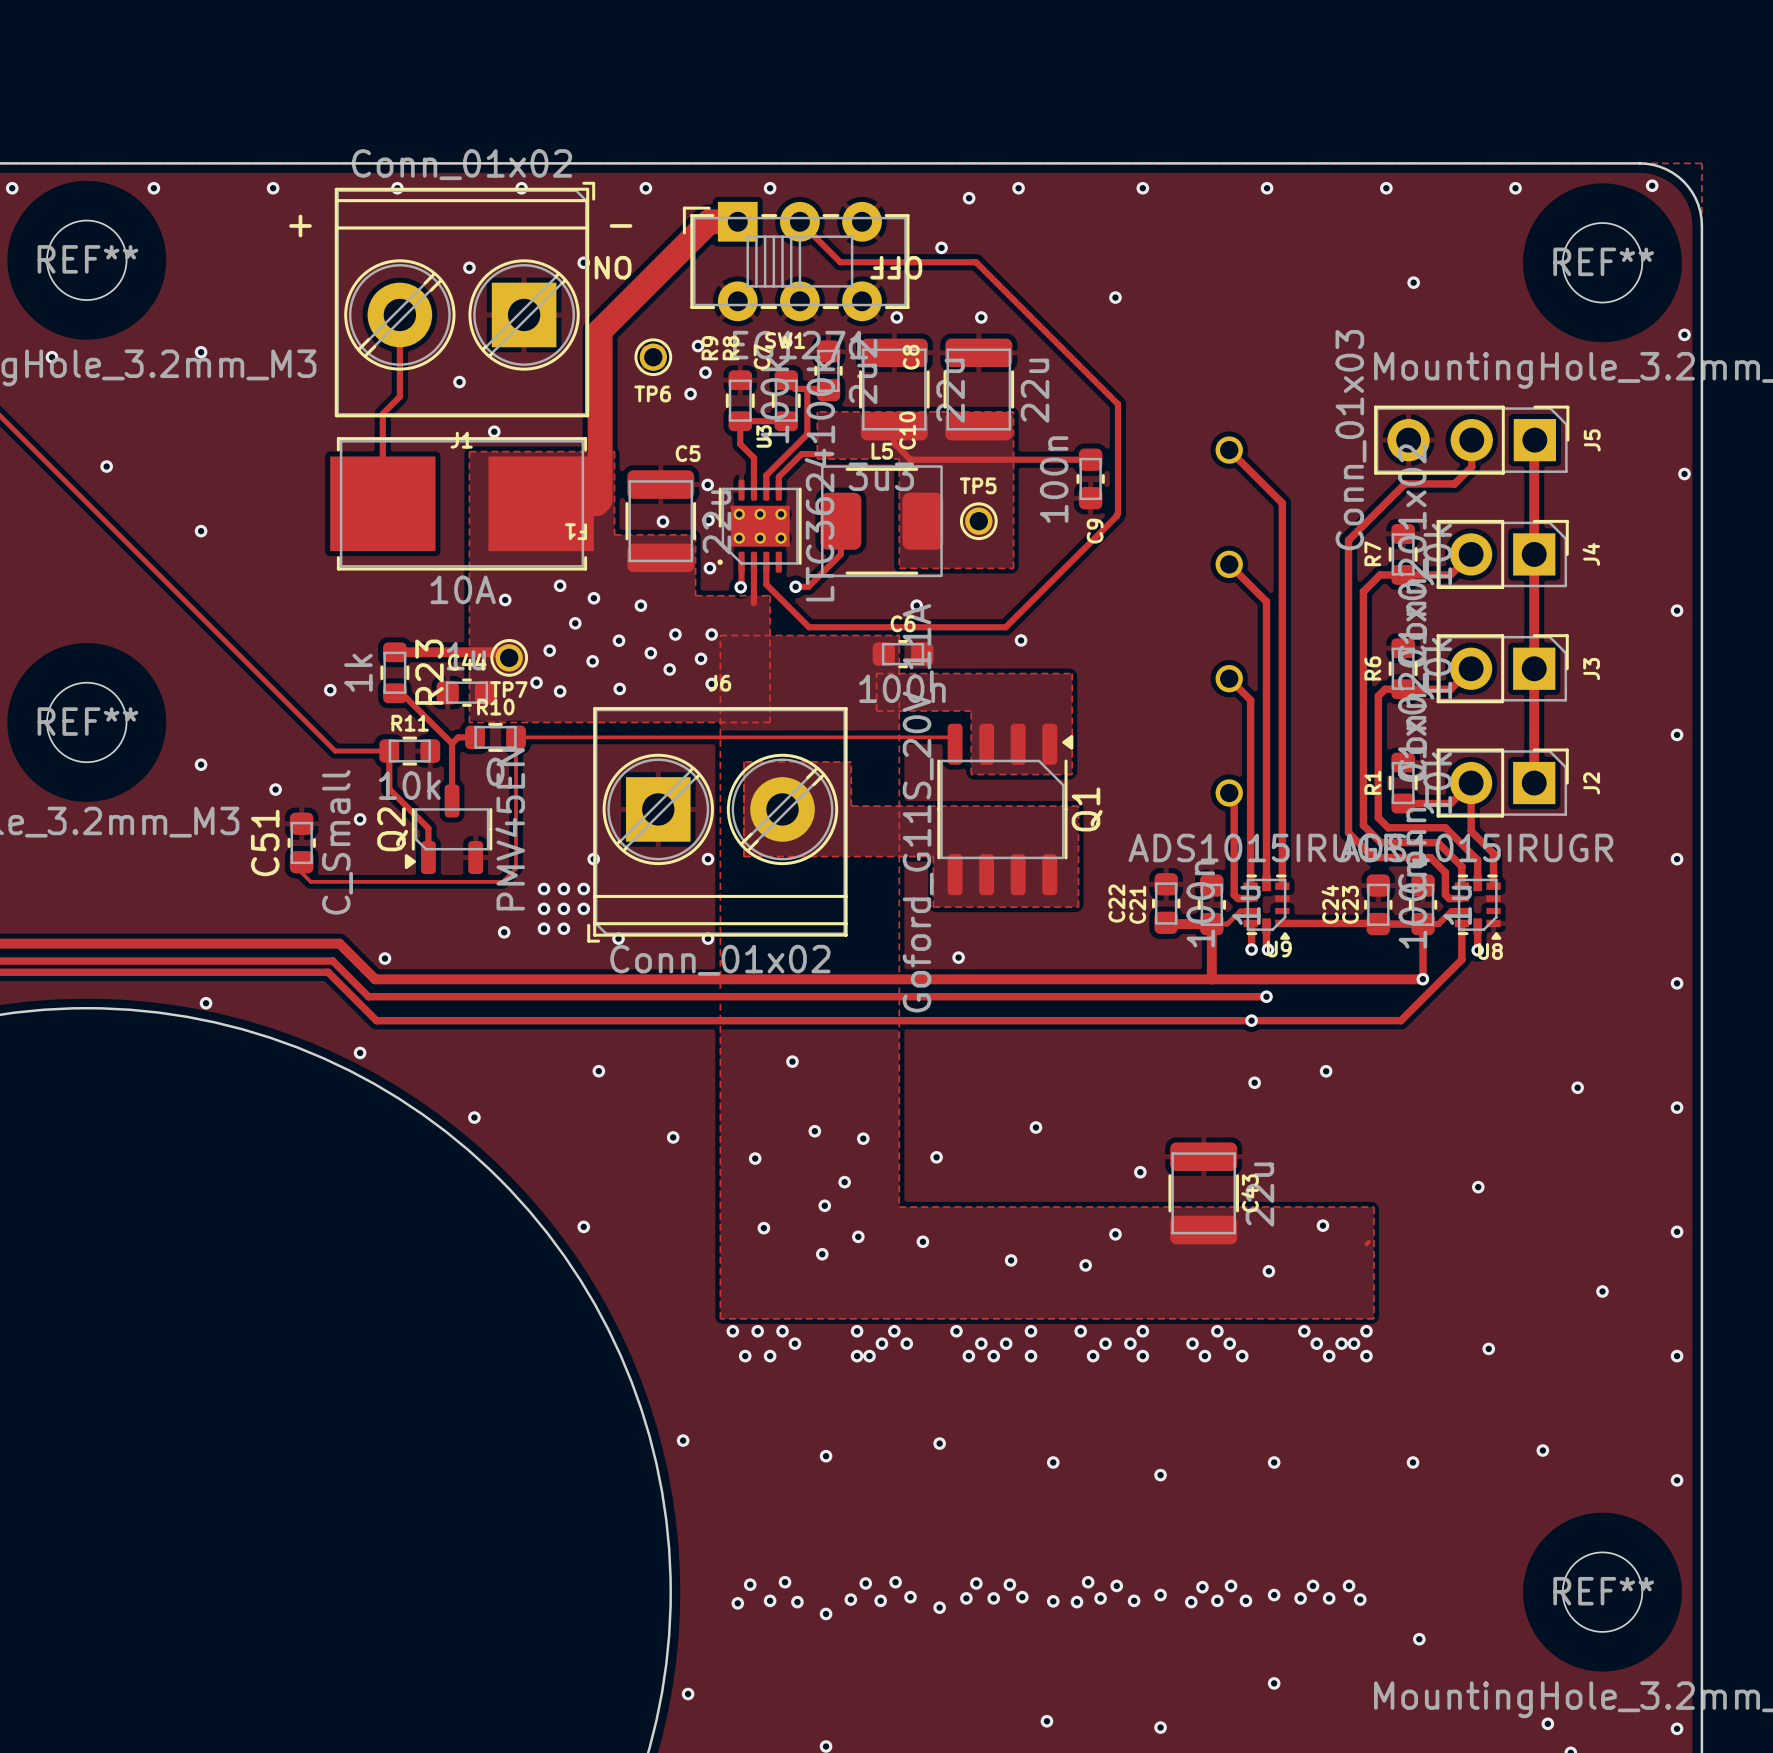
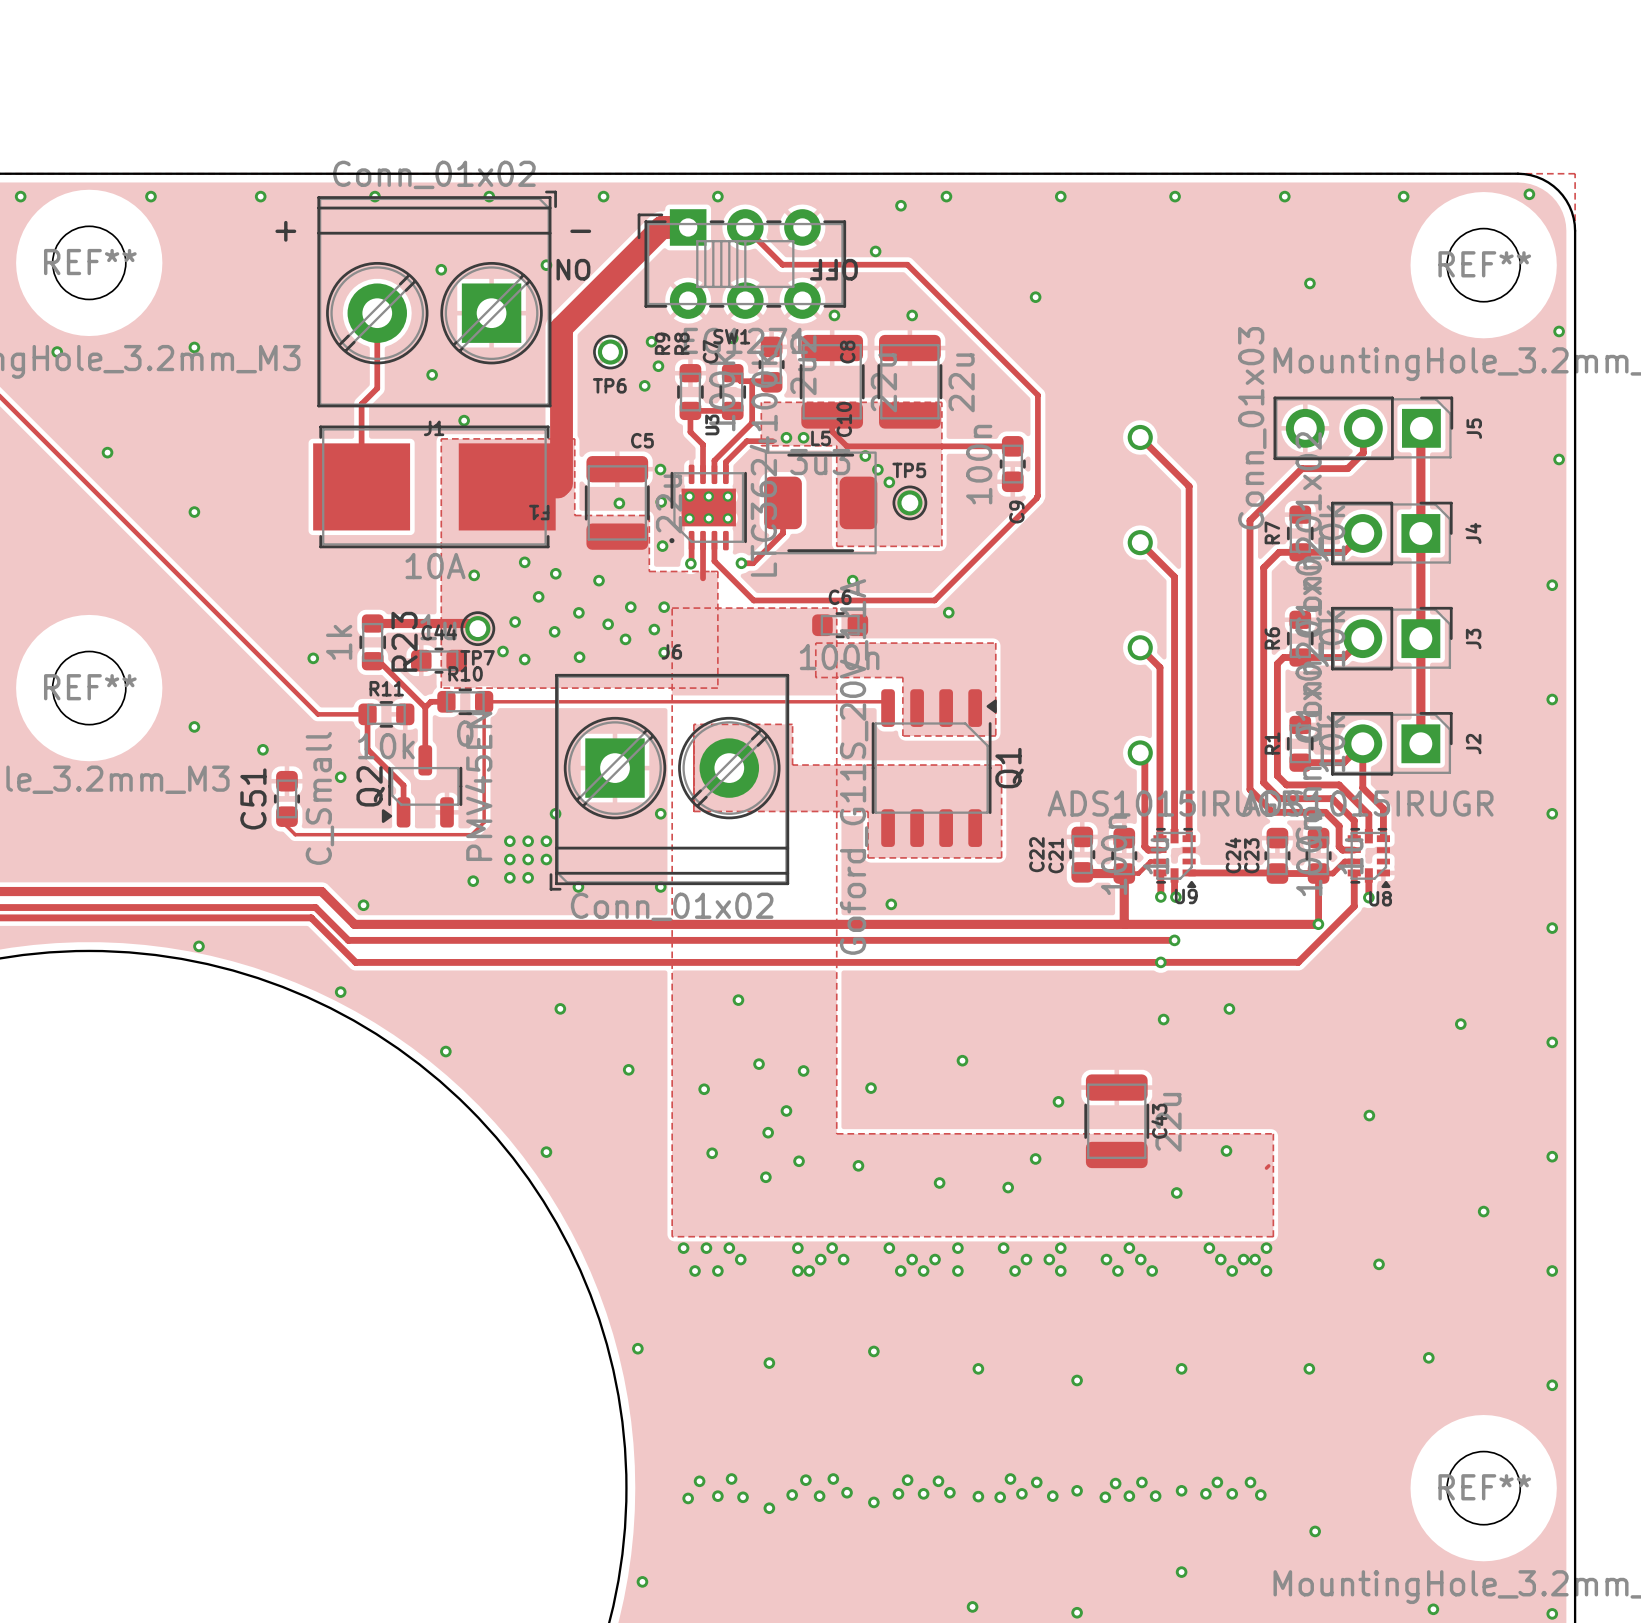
via: none -> (786, 437)
via: none -> (803, 437)
via: none -> (865, 456)
via: none -> (877, 469)
via: none -> (889, 482)

